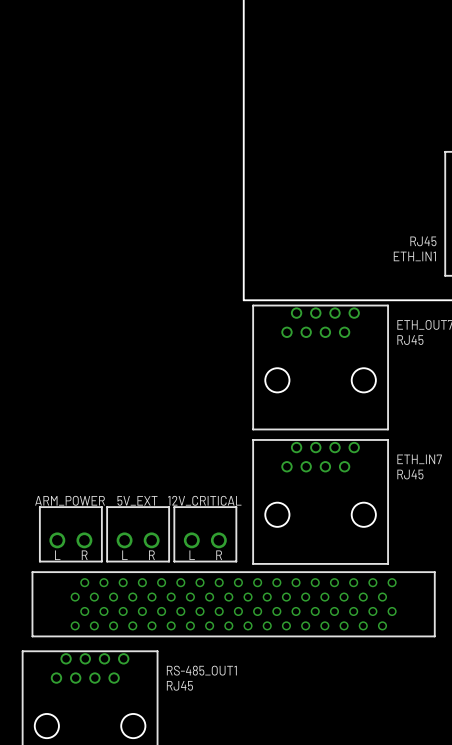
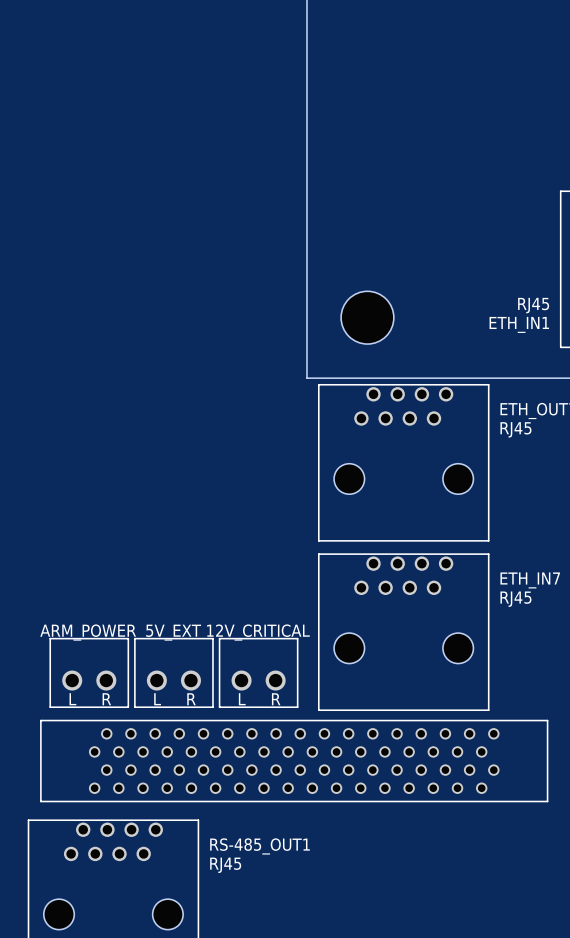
hole: none -> (367, 317)

